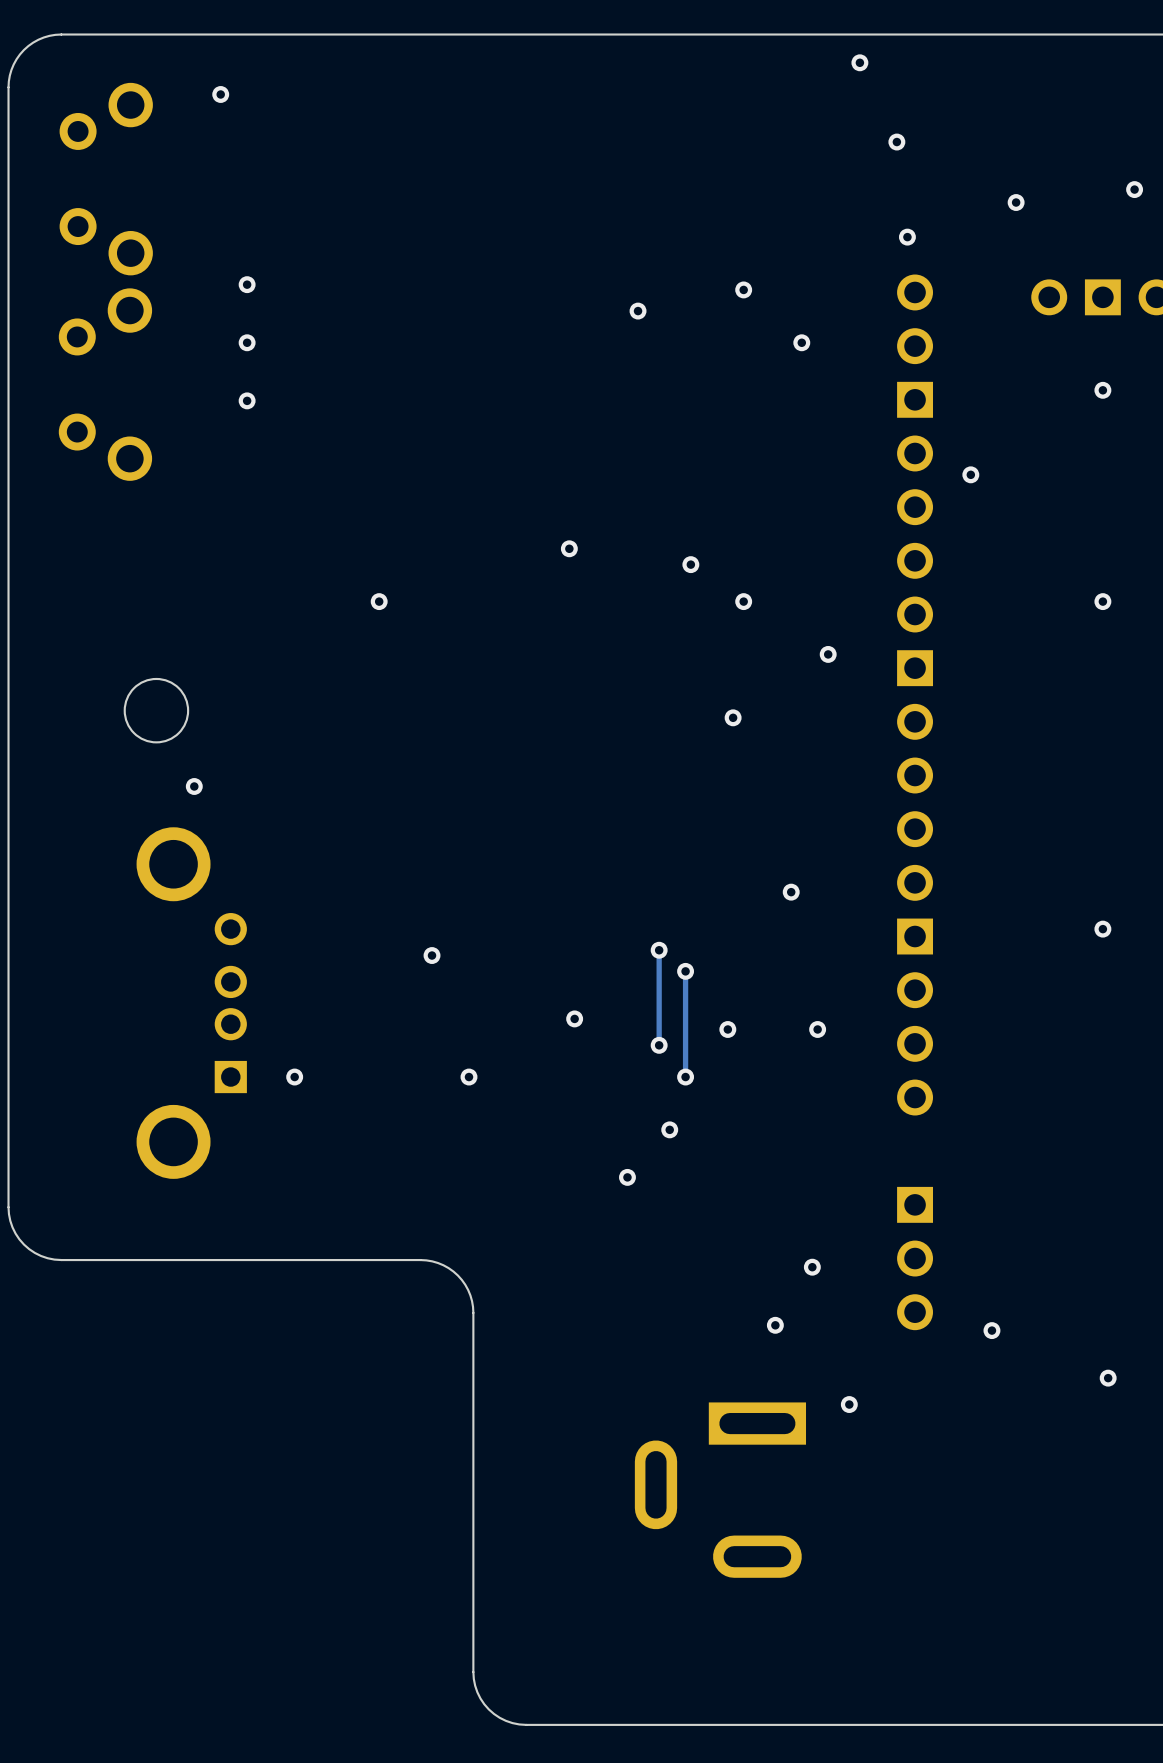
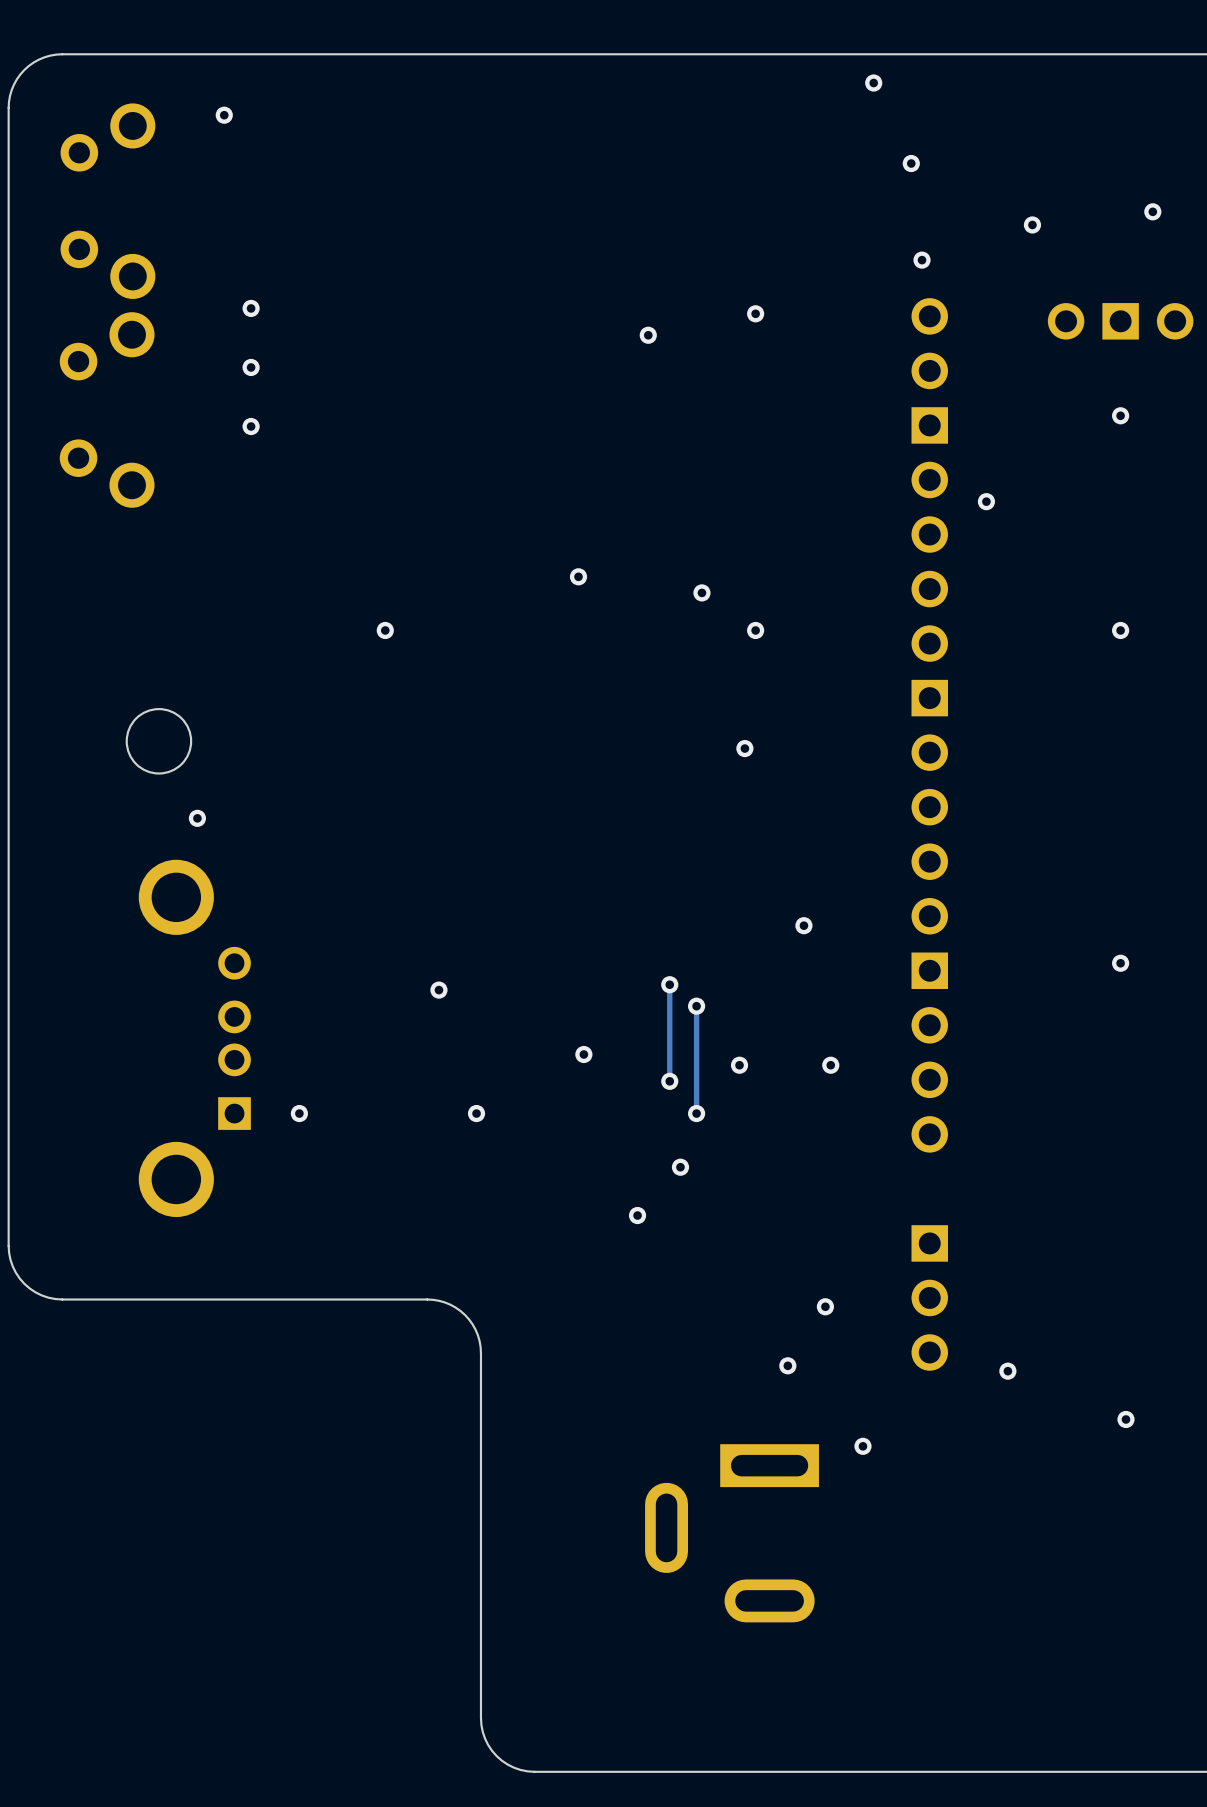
via: (801, 342) -> none
via: (828, 654) -> none

